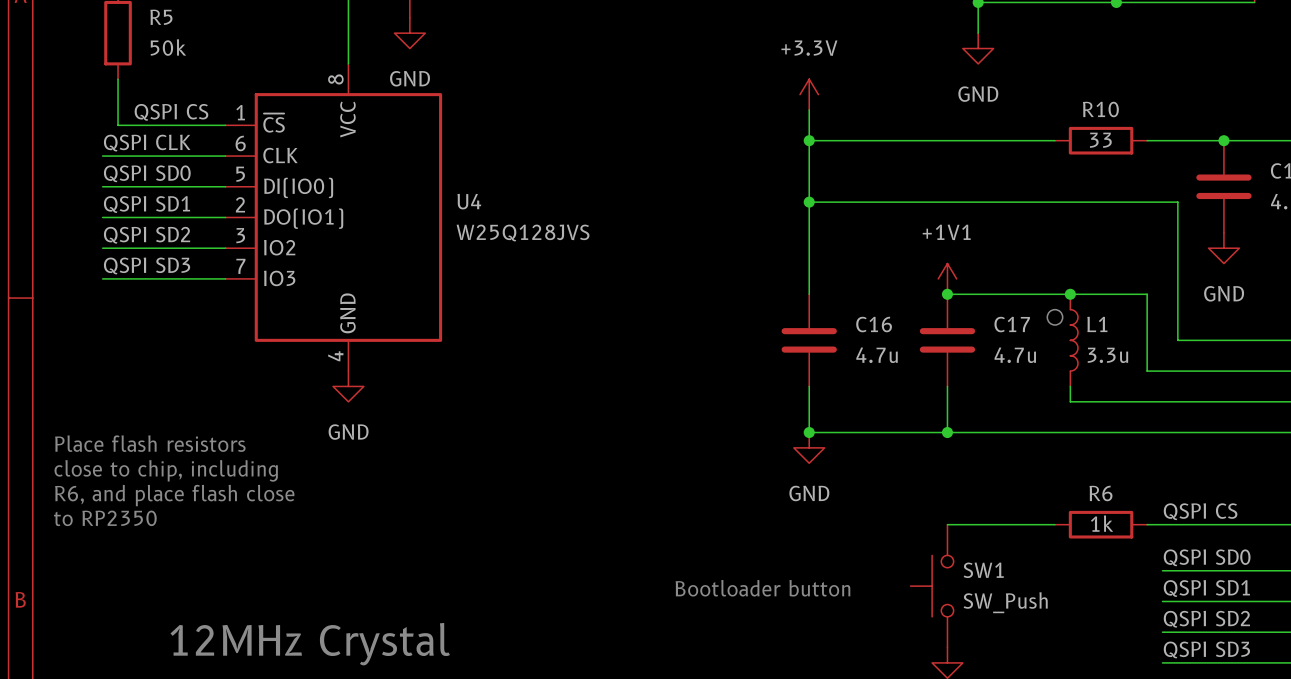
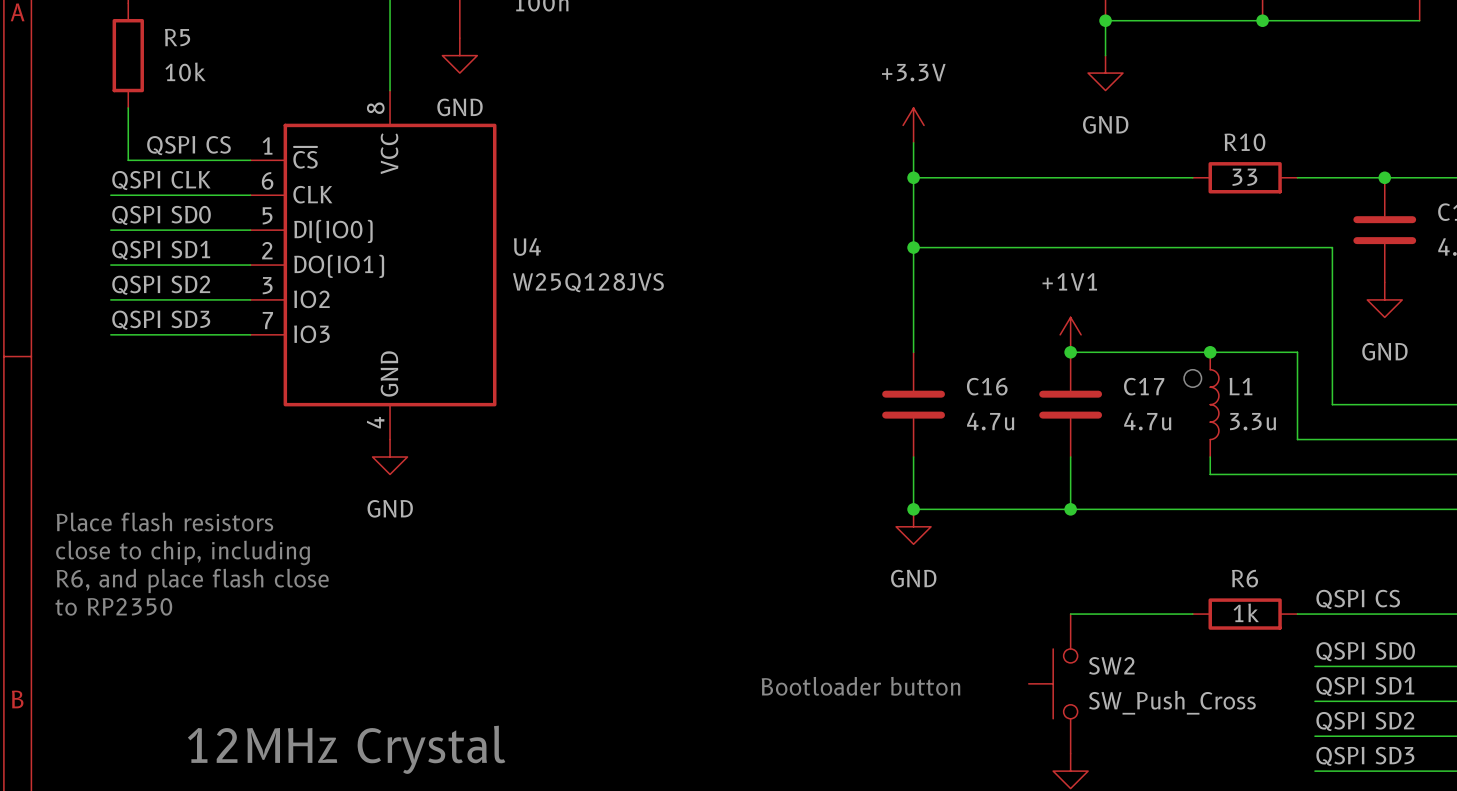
R5 value: 50k (168, 47) -> 10k (185, 71)
SW1 name: SW1 (983, 570) -> SW2 (1111, 665)
SW1 value: SW_Push (1005, 602) -> SW_Push_Cross (1172, 702)

